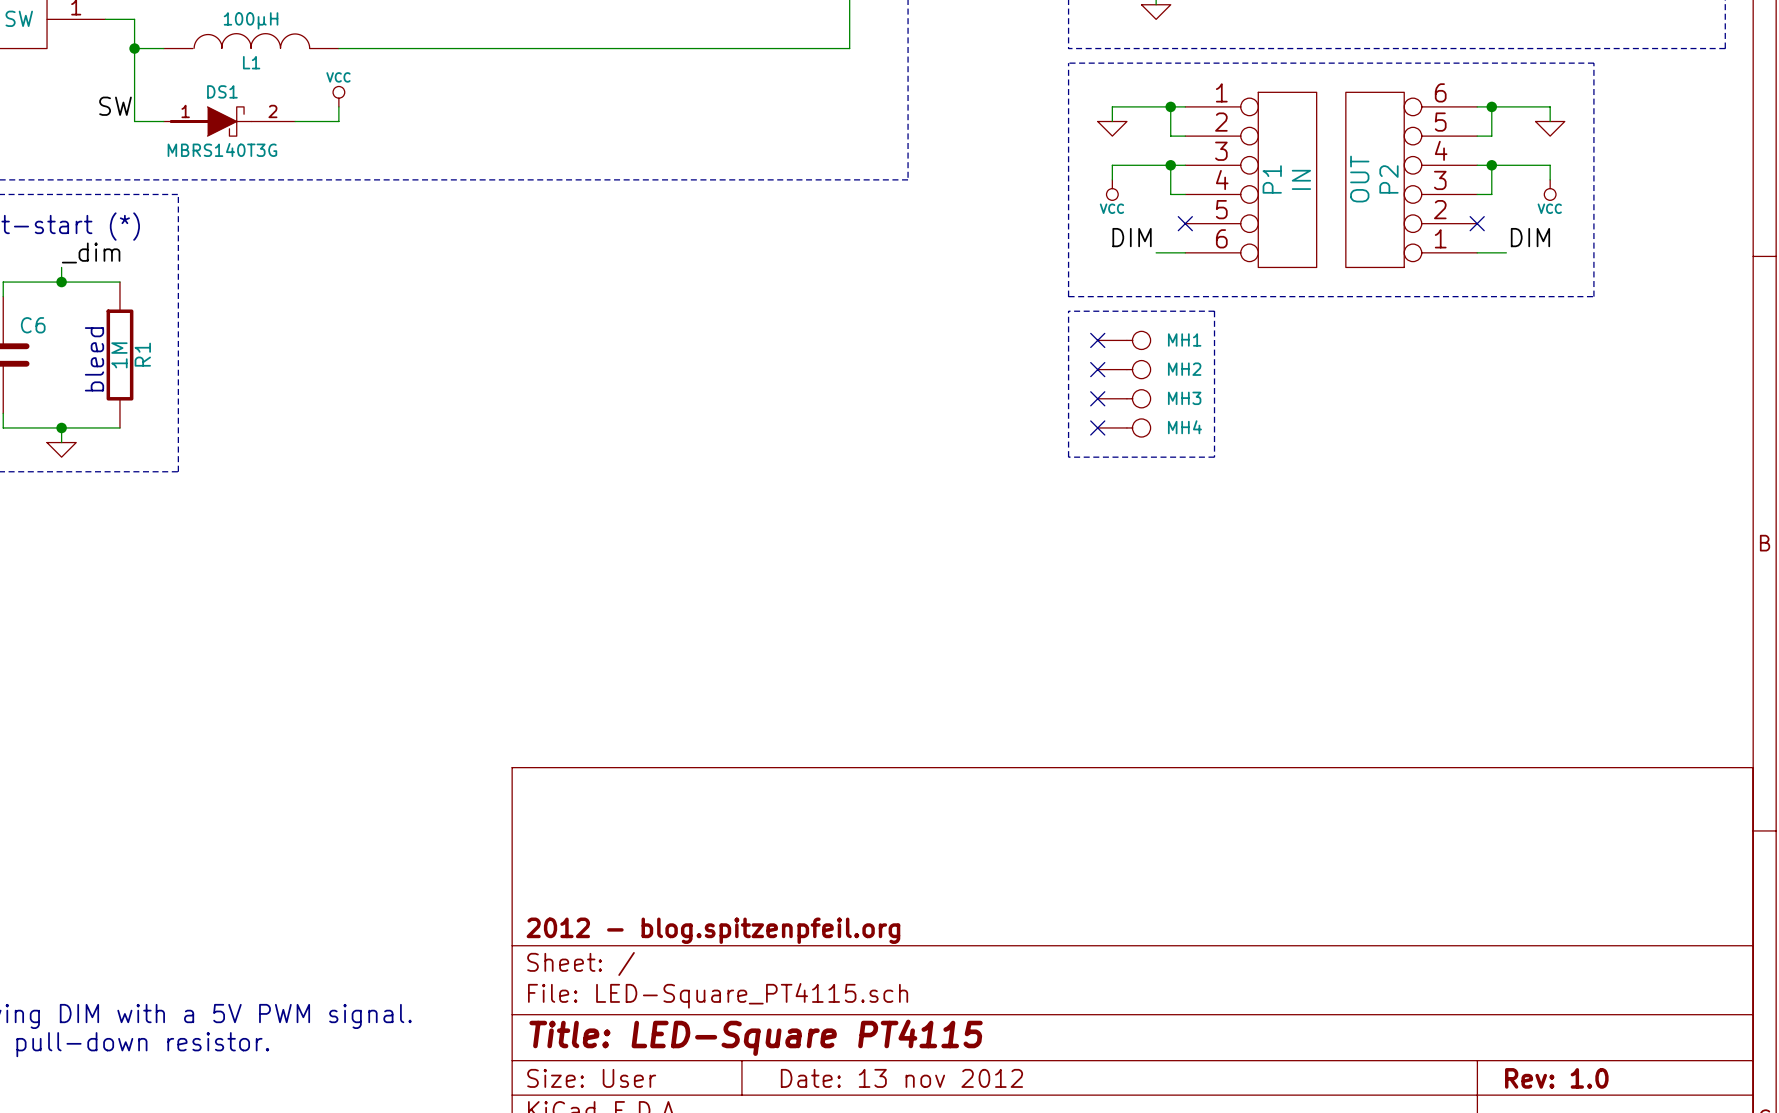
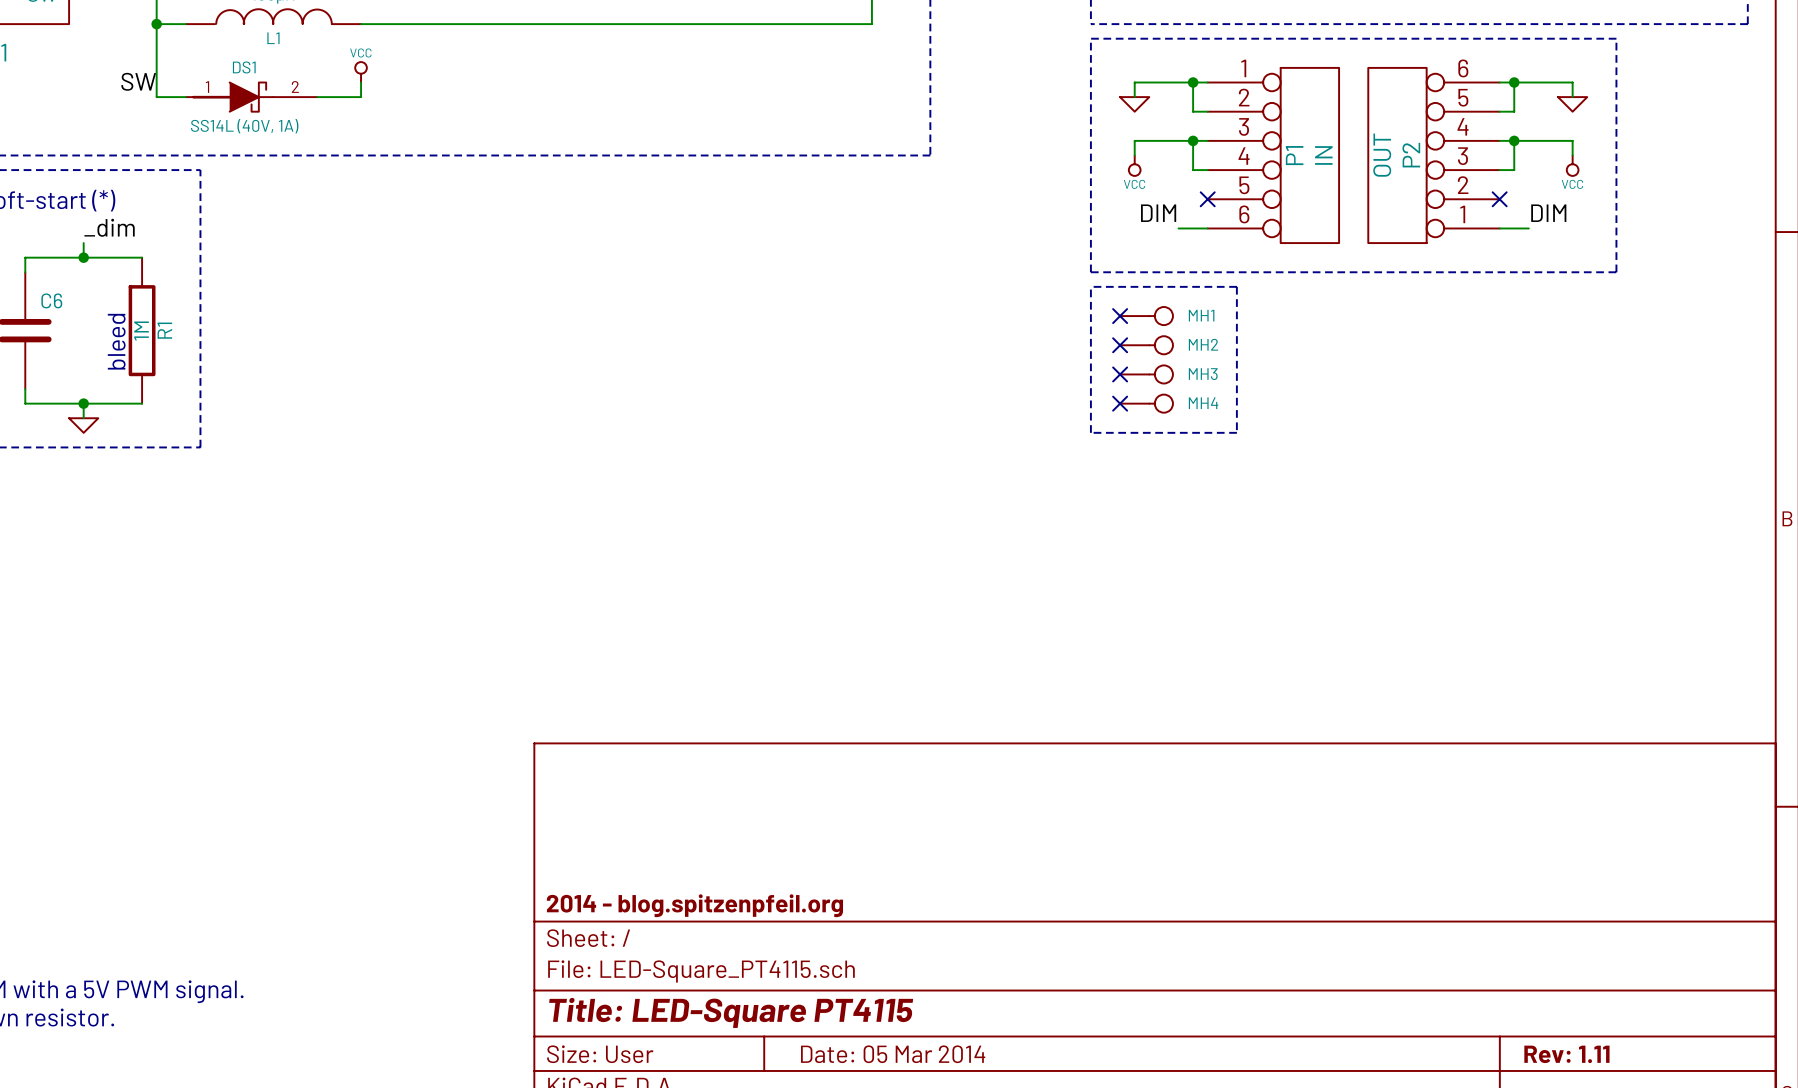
DS1 value: MBRS140T3G (222, 149) -> SS14L (40V, 1A) (244, 126)
title block: 2012 - blog.spitzenpfeil.org (713, 930) -> 2014 - blog.spitzenpfeil.org (694, 905)
title block: Date: 13 nov 2012 (901, 1078) -> Date: 05 Mar 2014 (893, 1054)
title block: Rev: 1.0 (1556, 1078) -> Rev: 1.11 (1566, 1054)

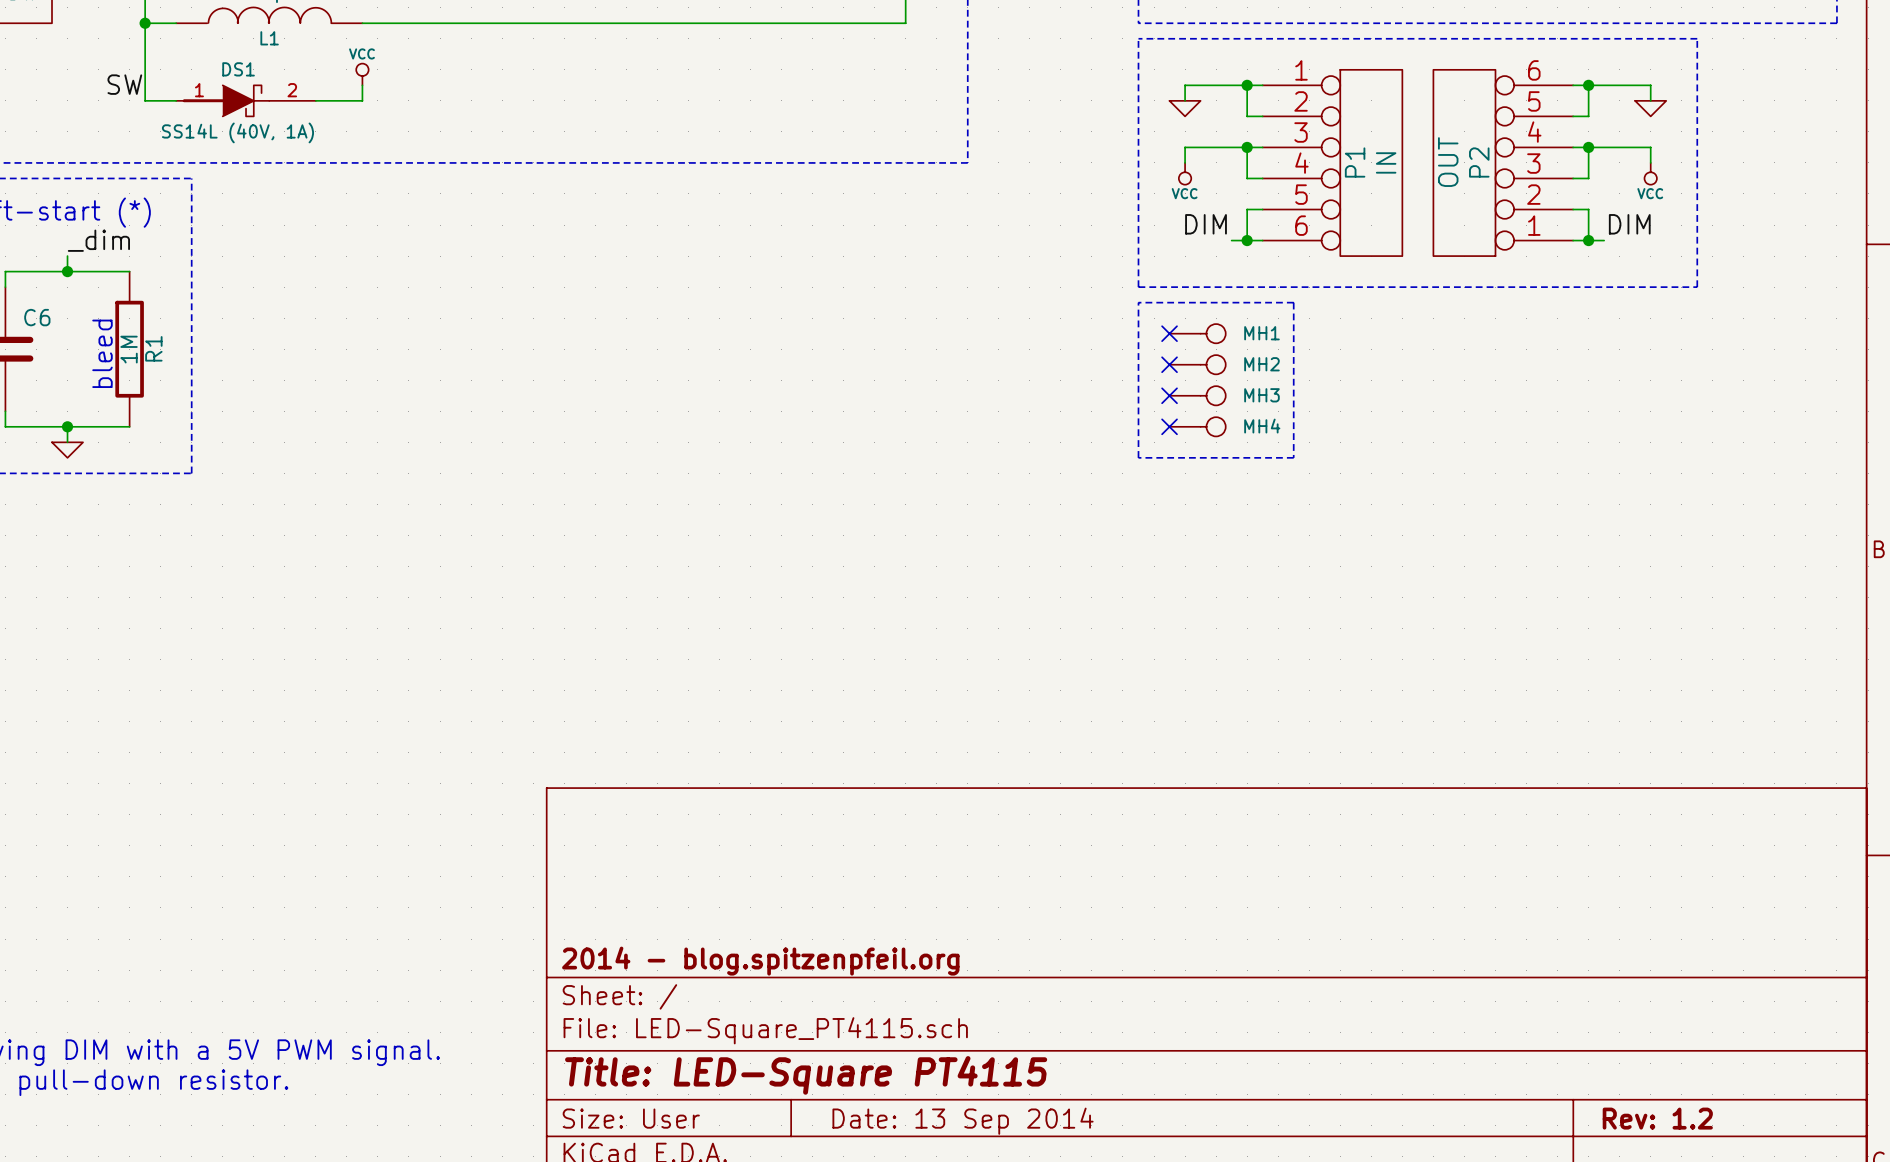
wire: none -> (1262, 209) (1247, 209) (1247, 240)
no-connect mark: (1207, 199) -> none
wire: none -> (1573, 209) (1588, 209) (1588, 240)
no-connect mark: (1499, 199) -> none
junction: none -> (1247, 240)
junction: none -> (1588, 240)
title block: Date: 05 Mar 2014 (893, 1054) -> Date: 13 Sep 2014 (963, 1121)
title block: Rev: 1.11 (1566, 1054) -> Rev: 1.2 (1657, 1118)

